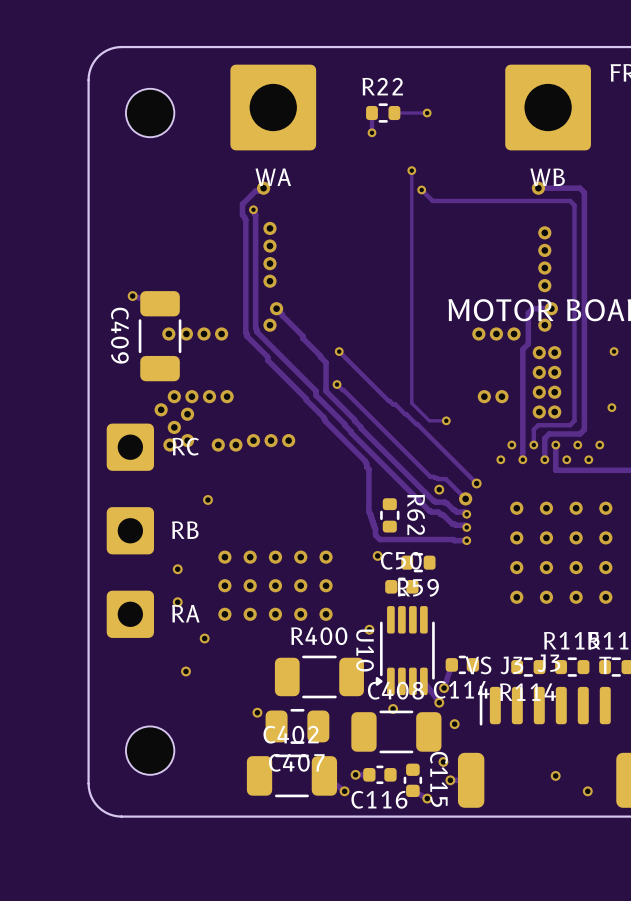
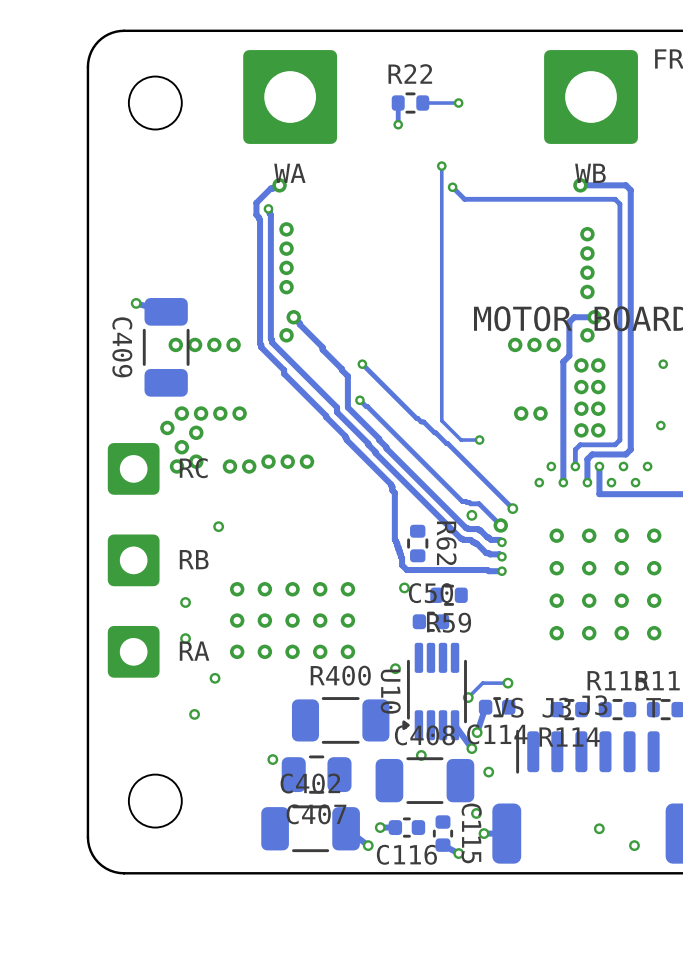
track: none -> (507, 683) (482, 683) (468, 697)
via: none -> (507, 683)
via: none -> (468, 697)

